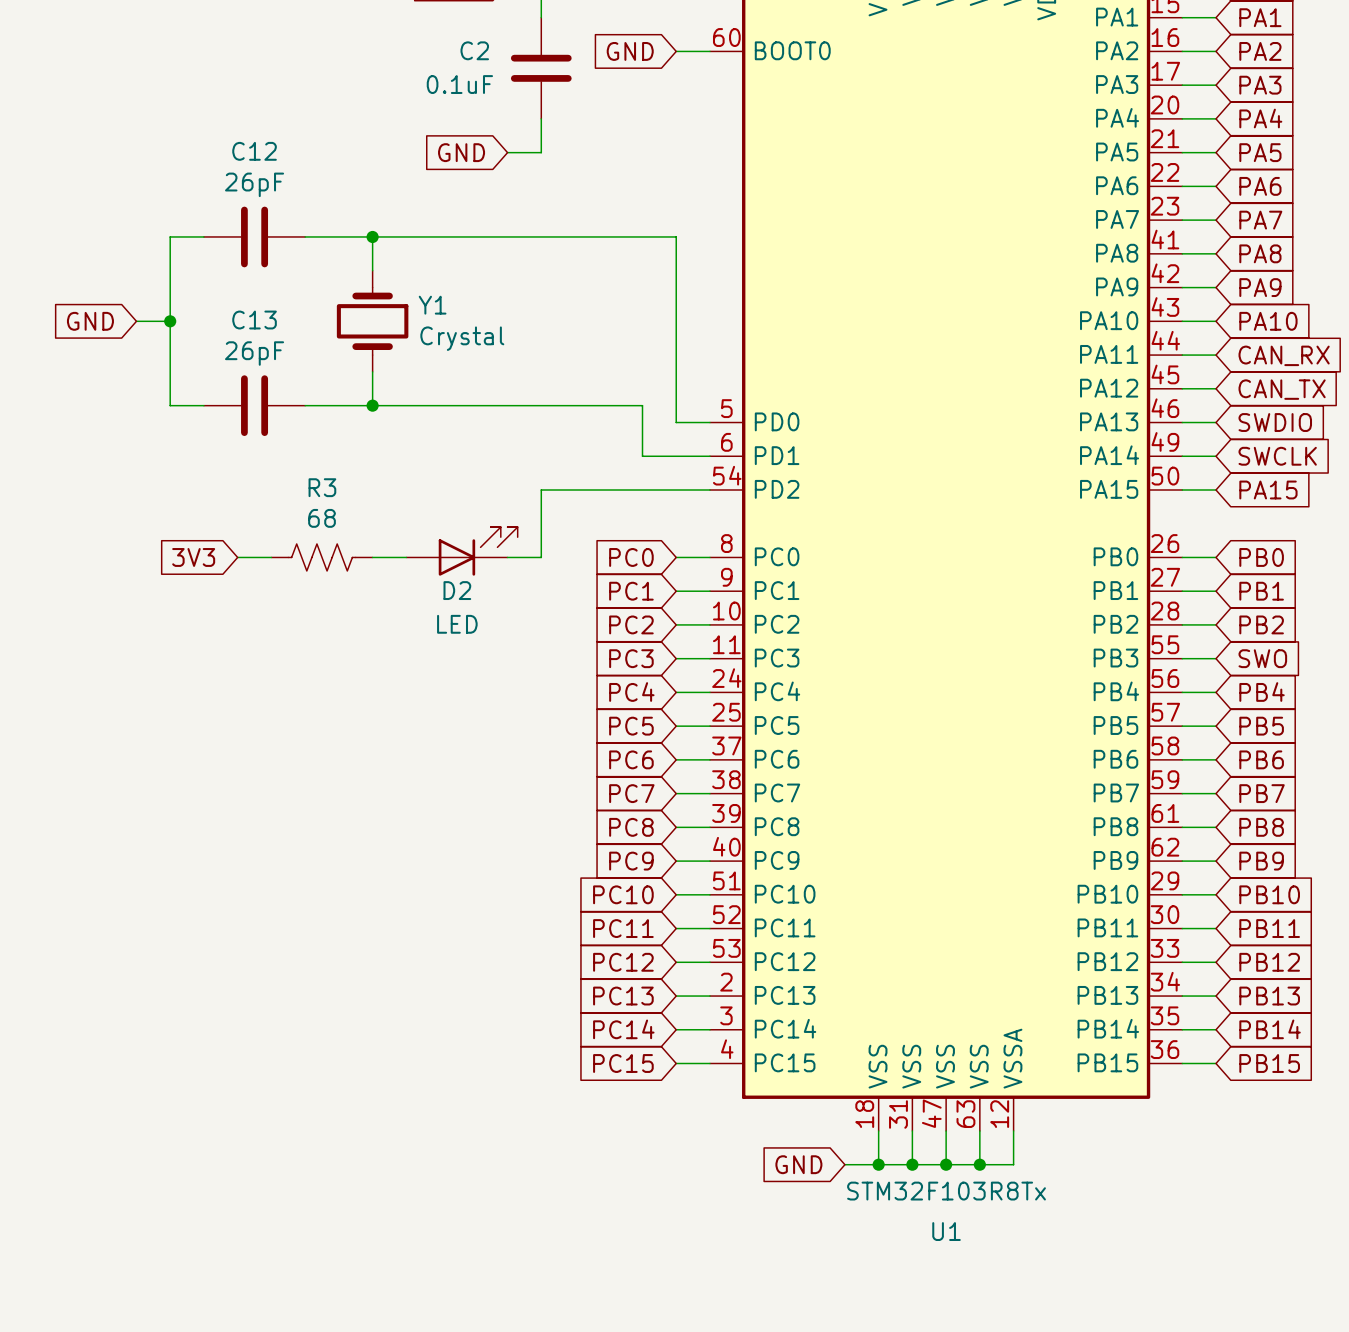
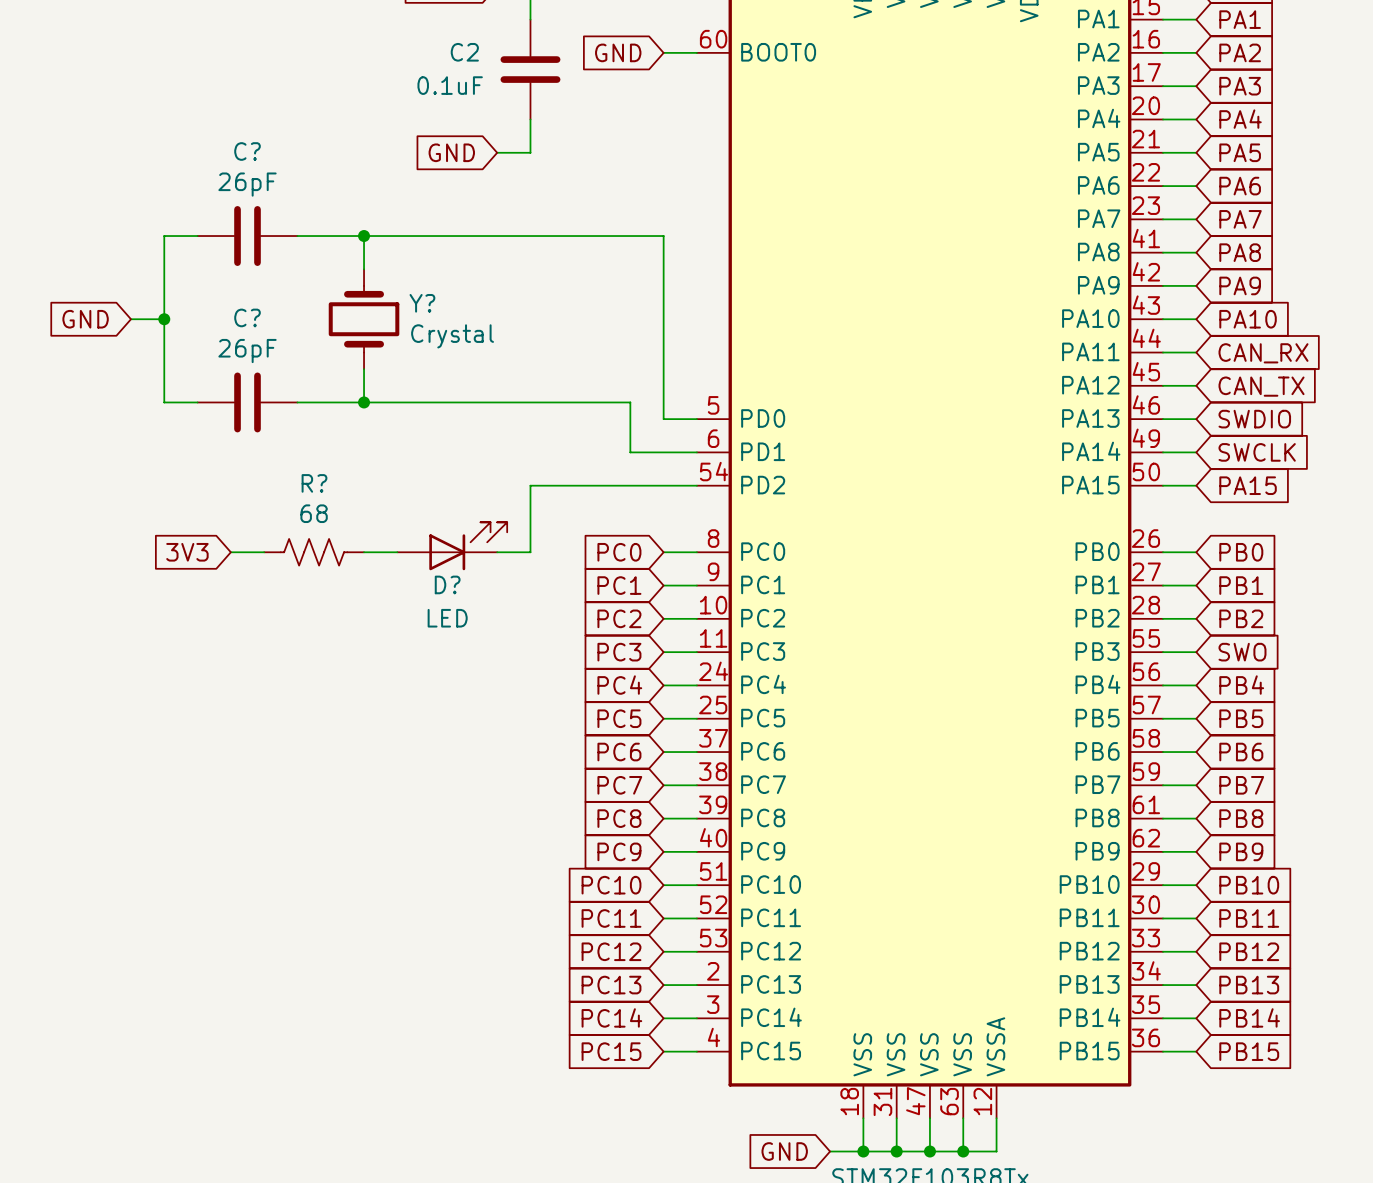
C12 name: C12 (254, 151) -> C? (247, 151)
Y1 name: Y1 (432, 305) -> Y? (422, 303)
C13 name: C13 (254, 320) -> C? (247, 317)
R3 name: R3 (322, 487) -> R? (314, 483)
D2 name: D2 (457, 590) -> D? (447, 584)

